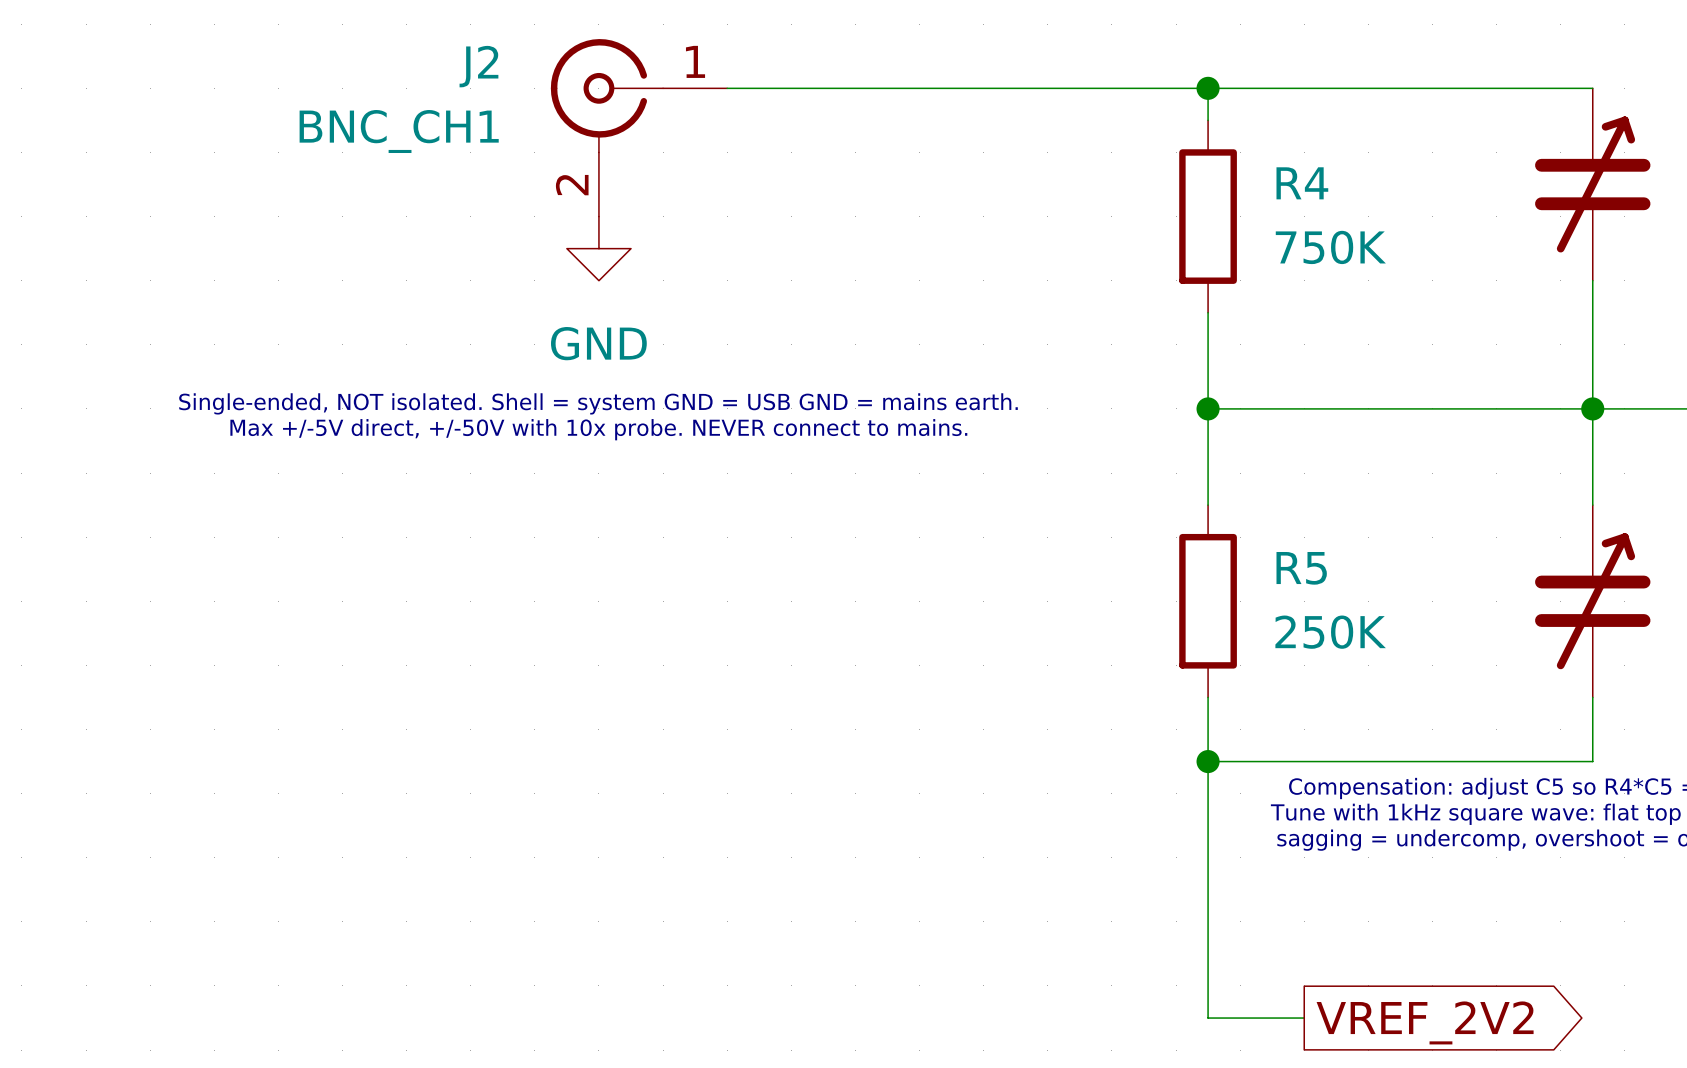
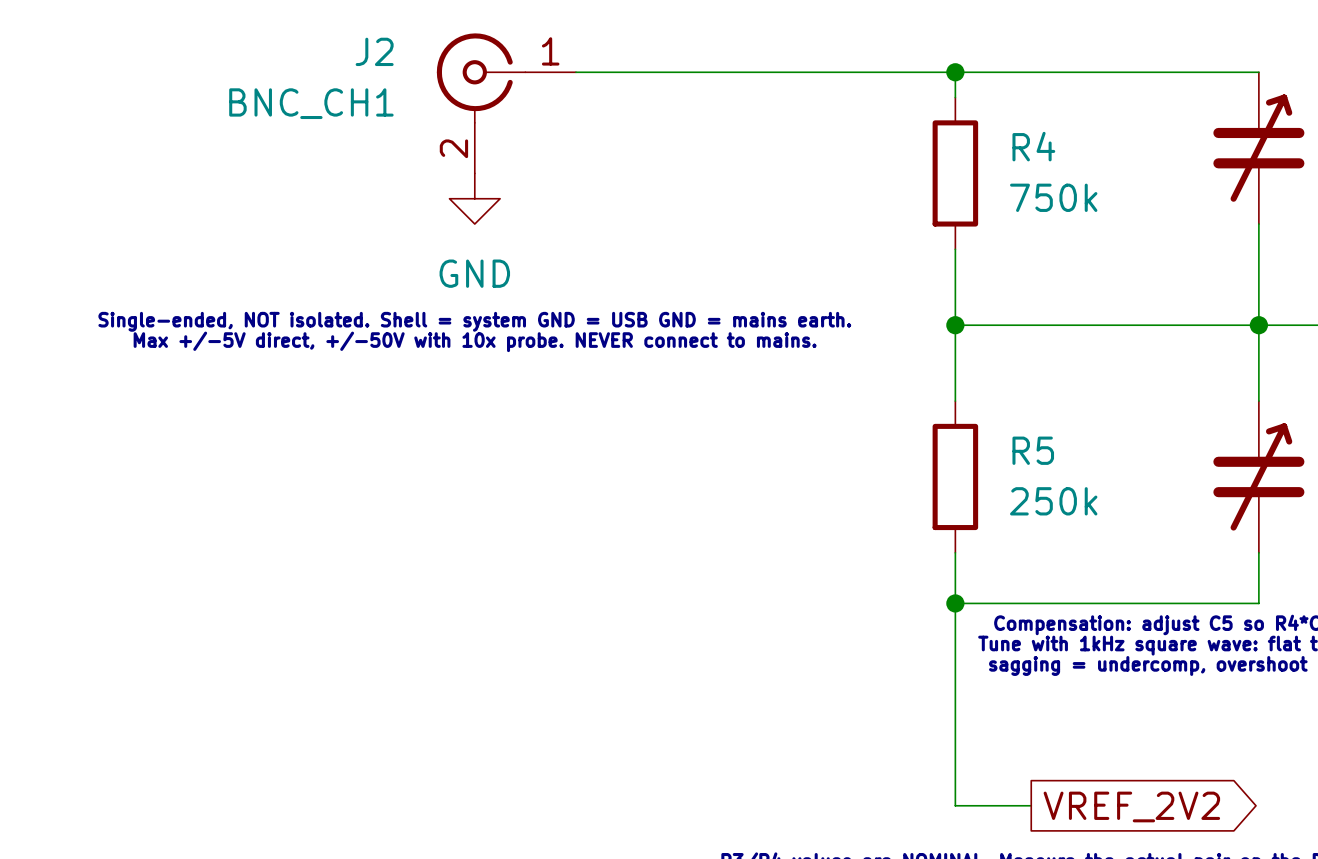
R4 value: 750K (1330, 247) -> 750k (1053, 197)
R5 value: 250K (1330, 632) -> 250k (1053, 501)

